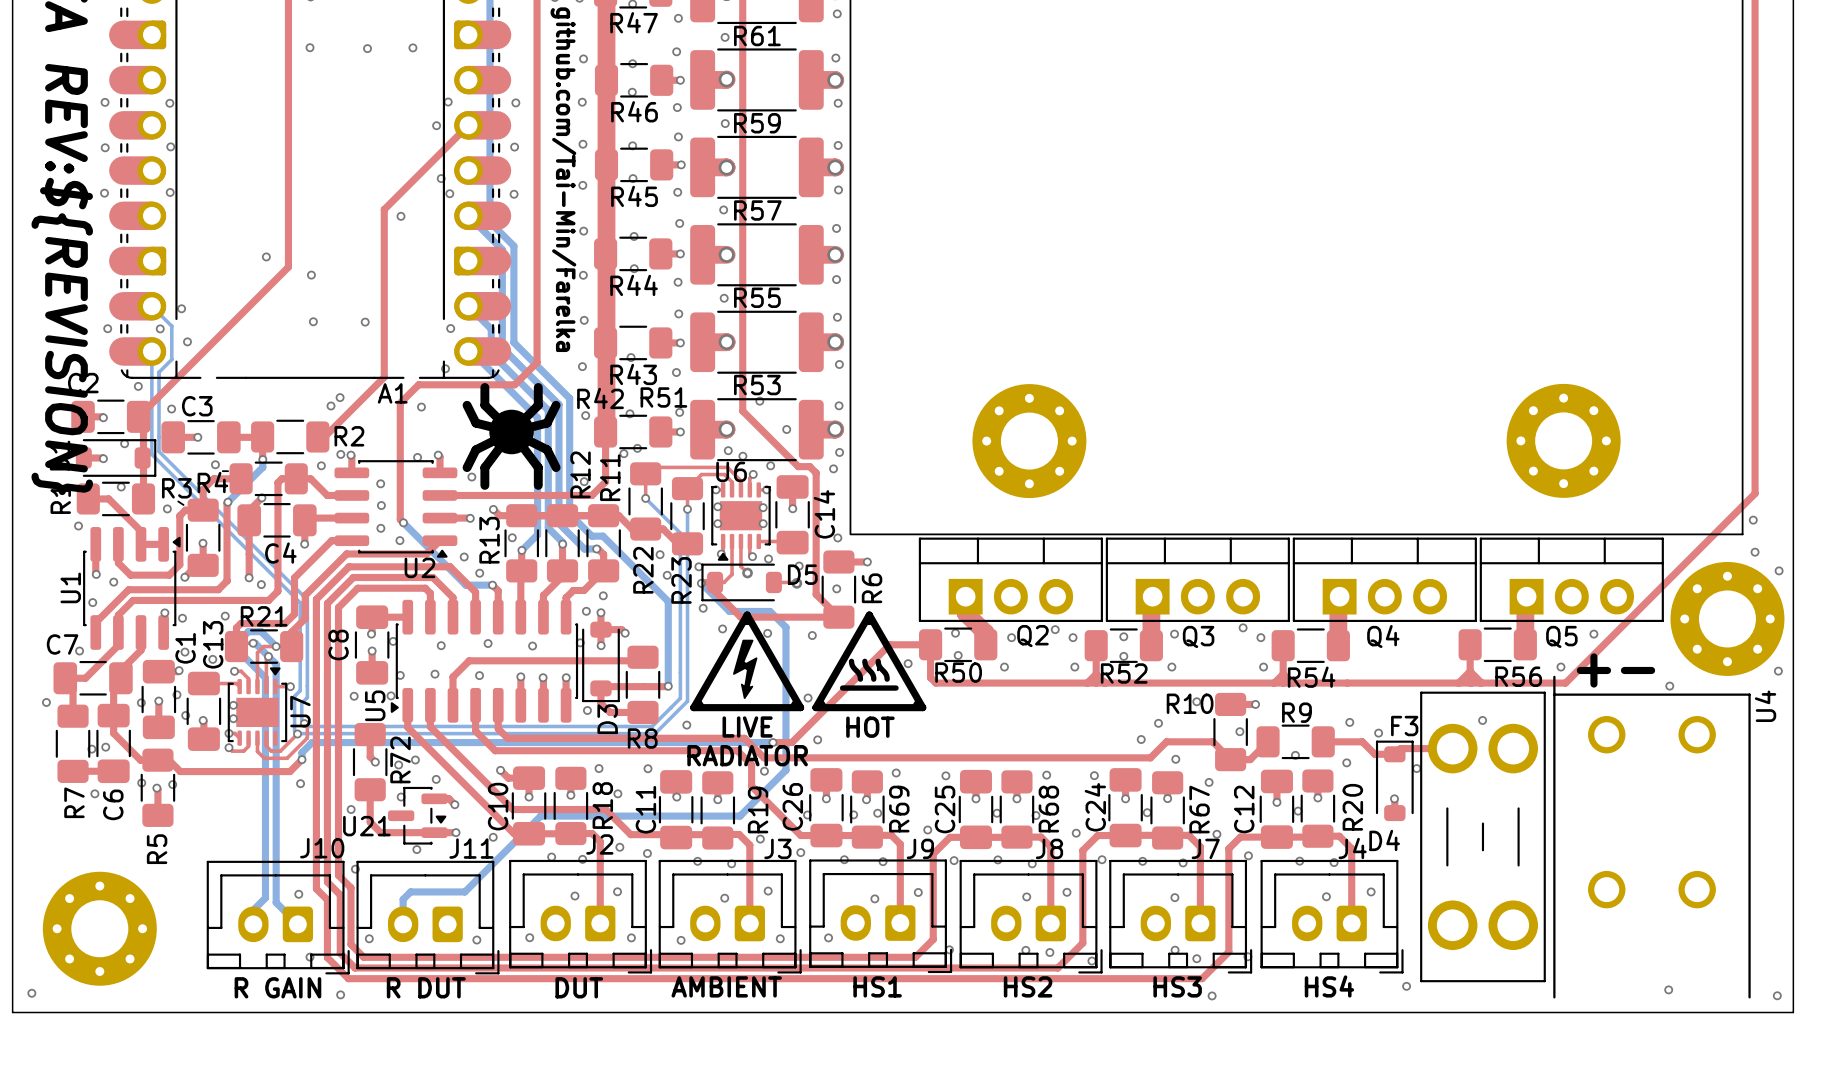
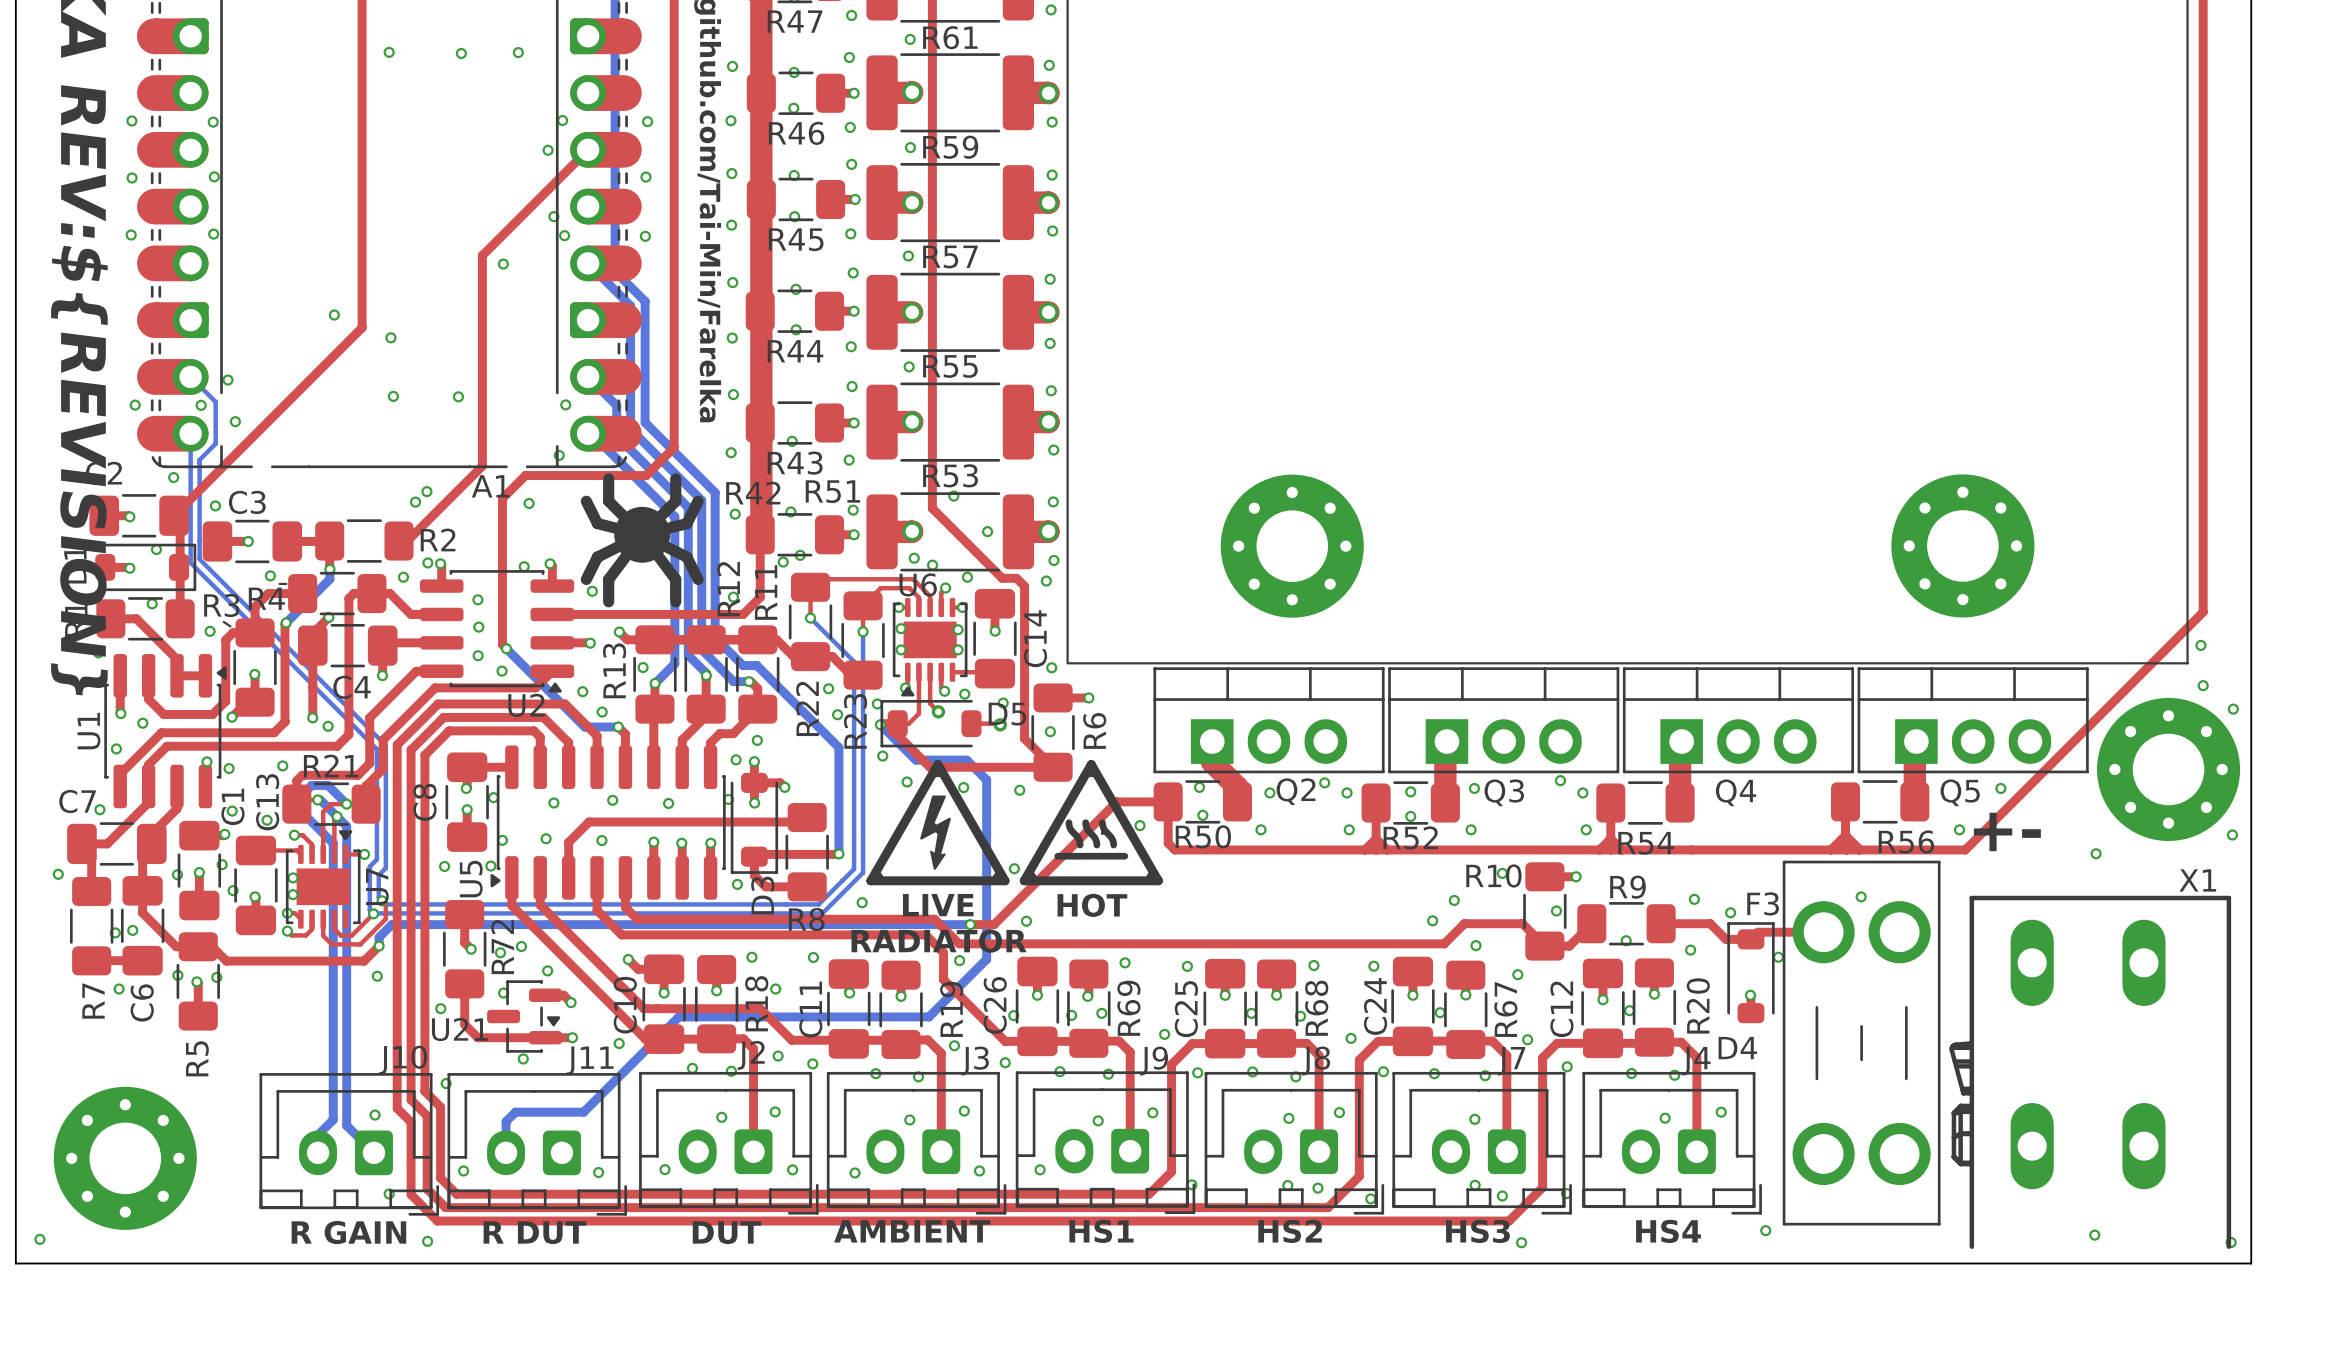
U4: (1651, 837) -> none
X1: none -> (2090, 1072)

